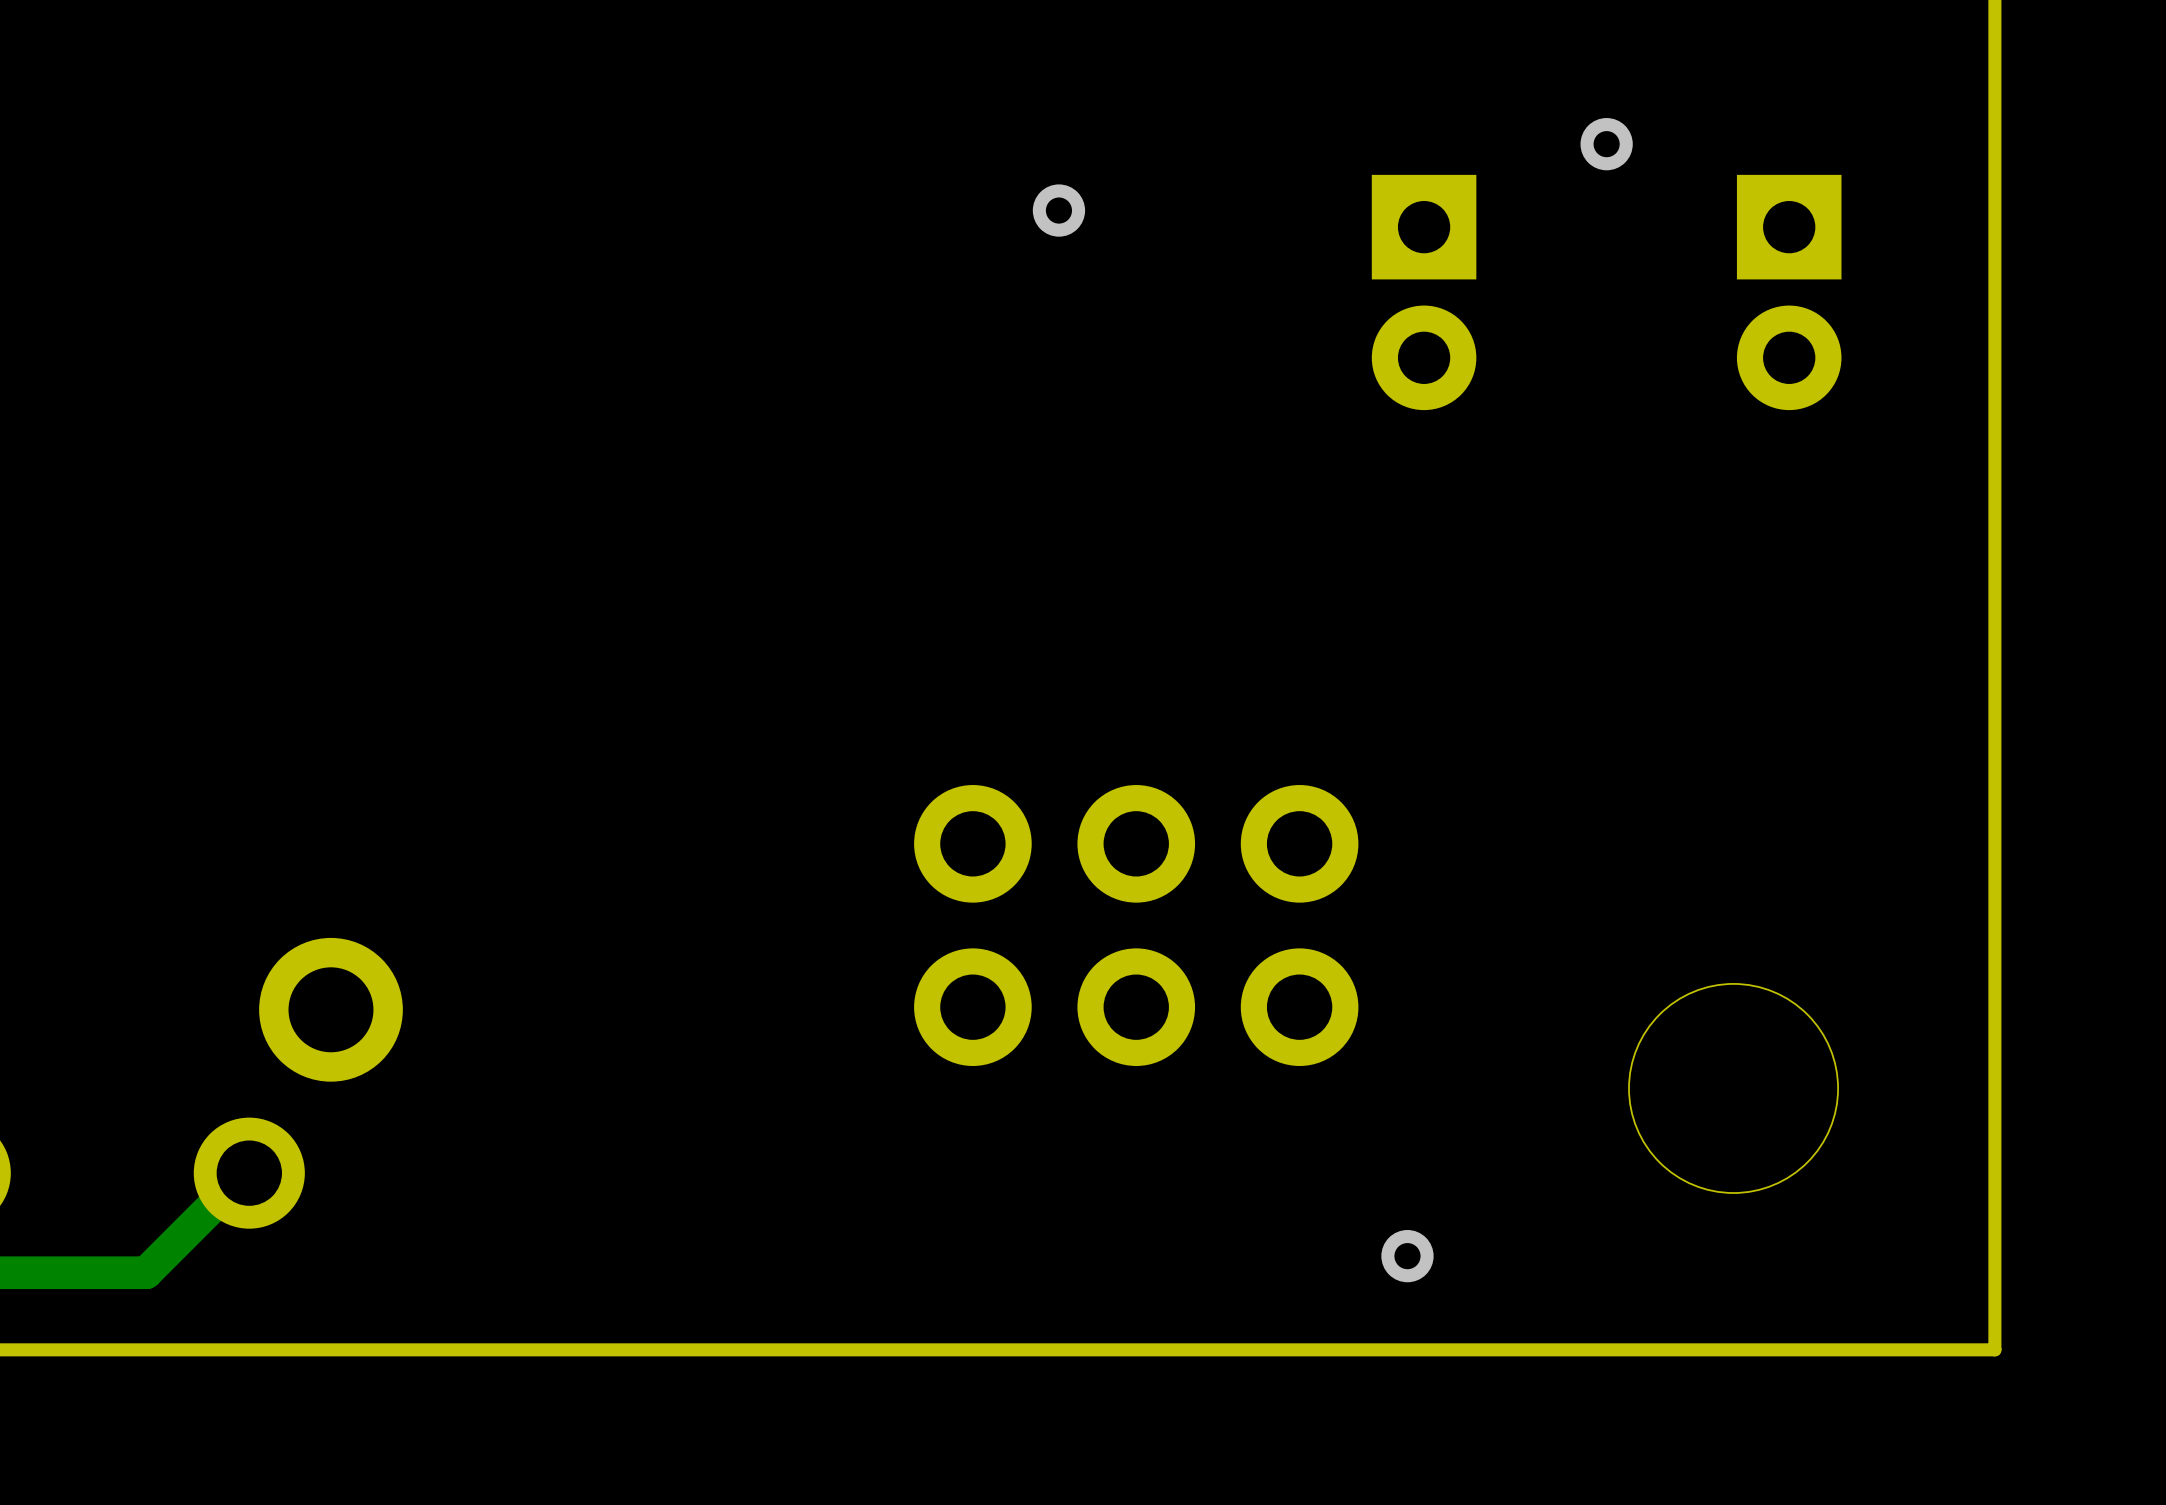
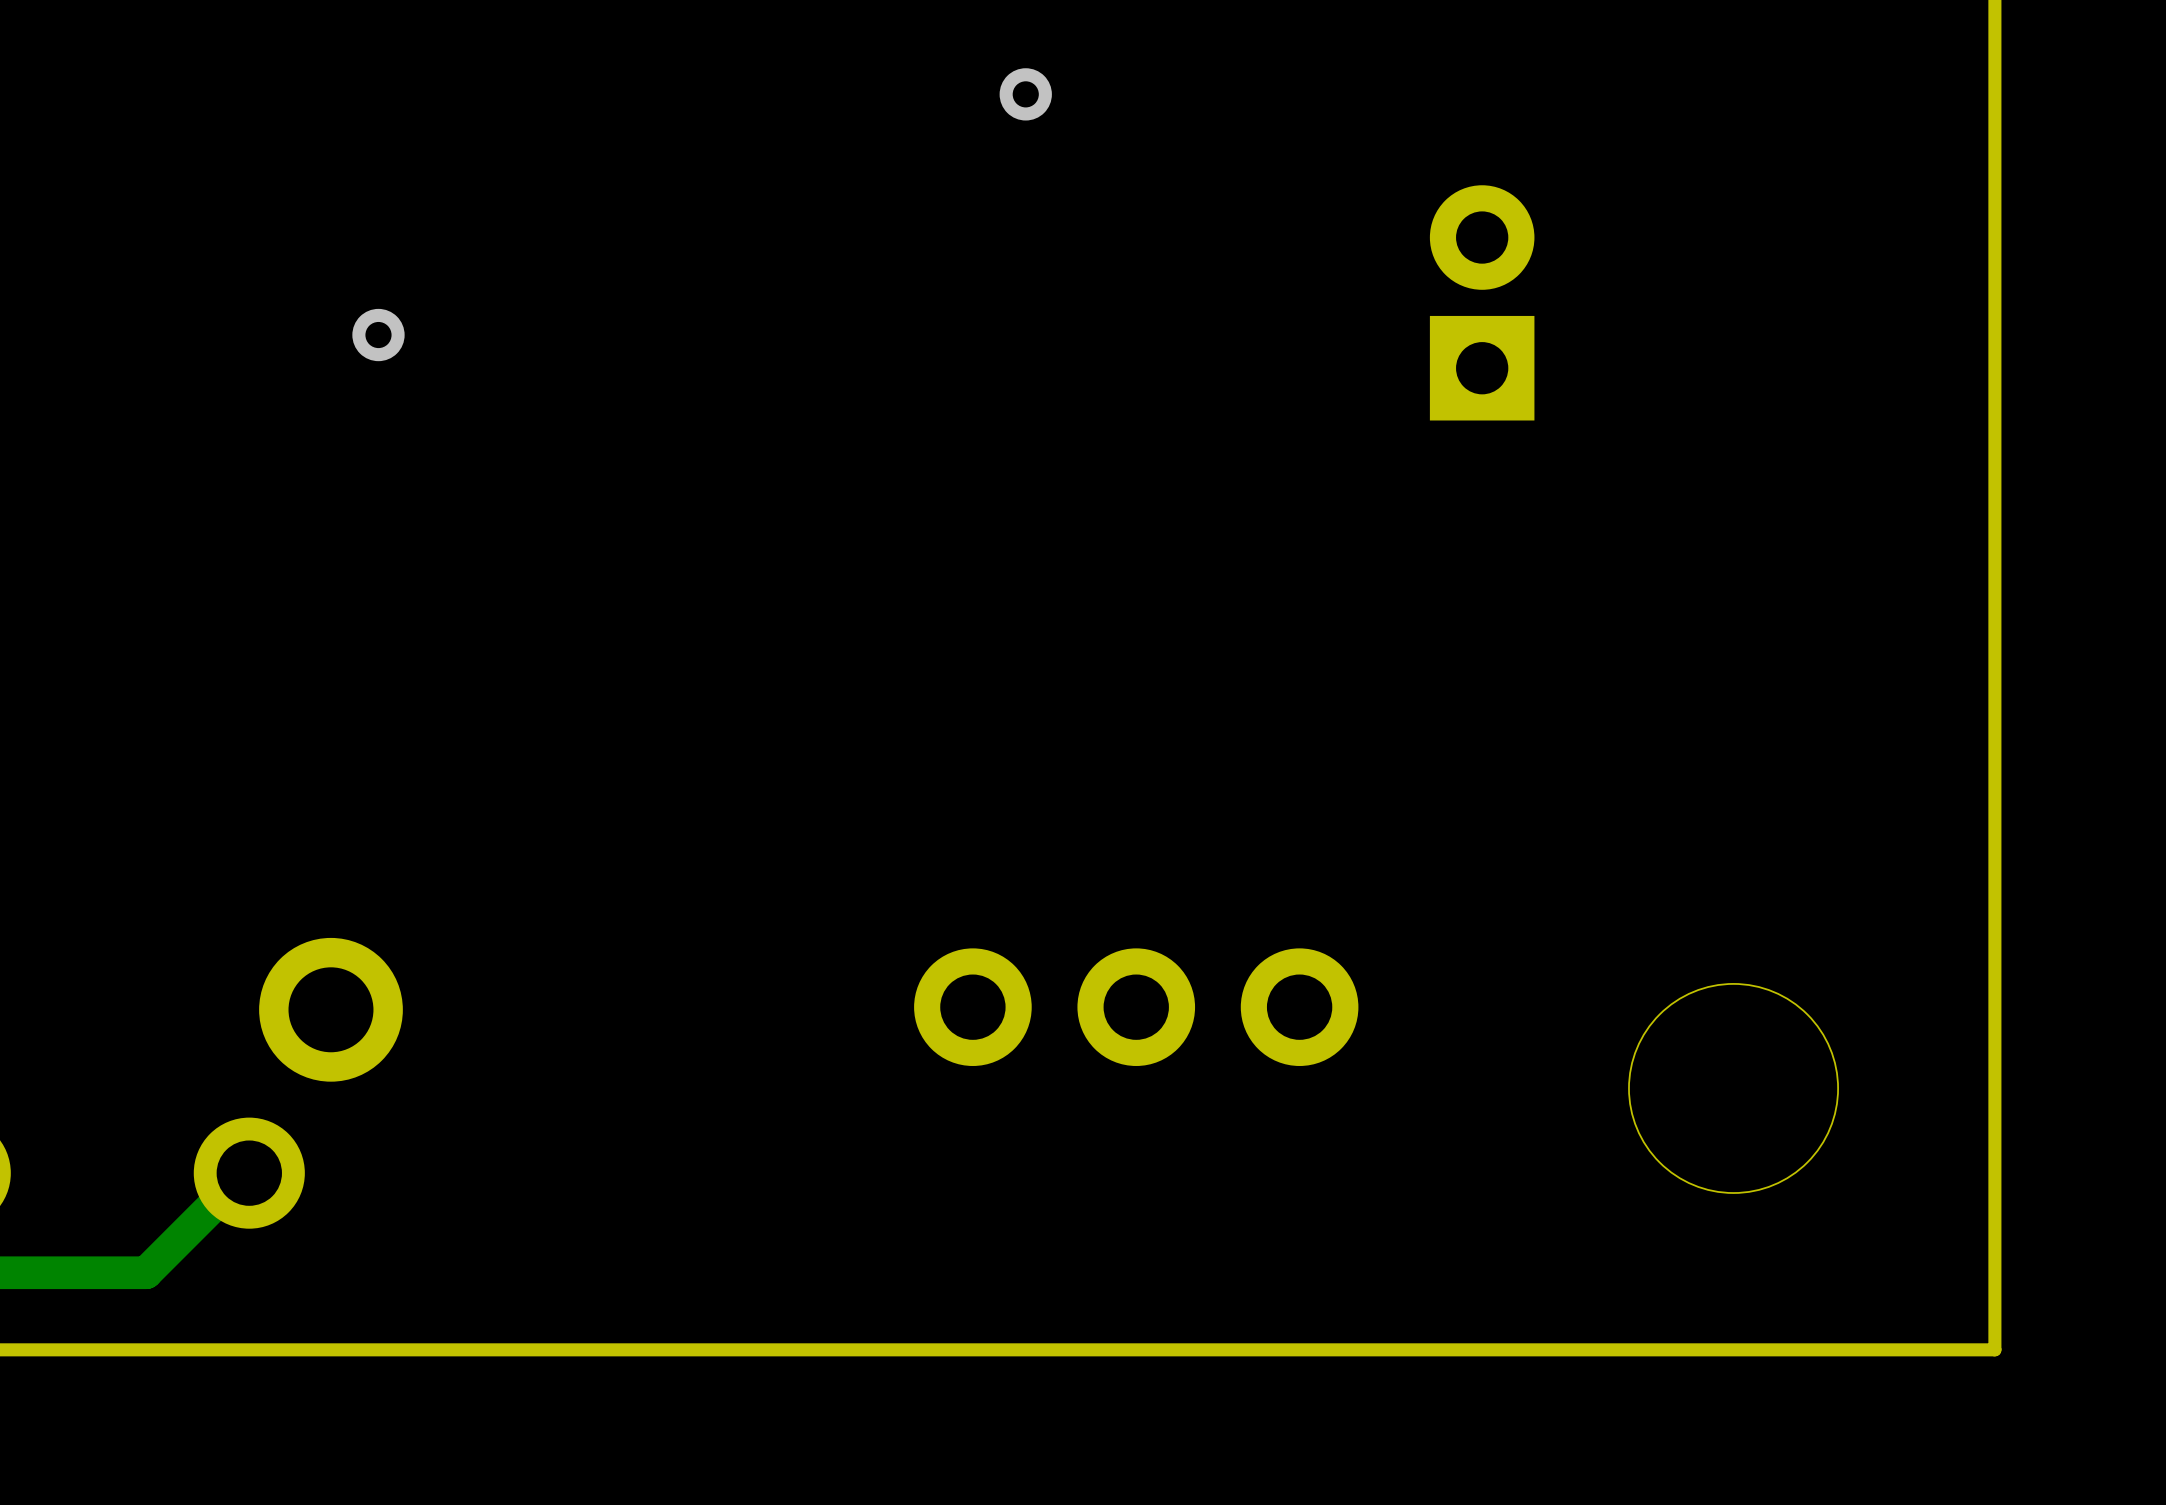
via: (1606, 144) -> none
via position: (1058, 210) -> (1025, 94)
part rotation: 0° (1424, 292) -> 180° (1482, 302)
part: (1789, 292) -> none
via: none -> (378, 335)
part: (1136, 925) -> none
via: (1407, 1256) -> none

